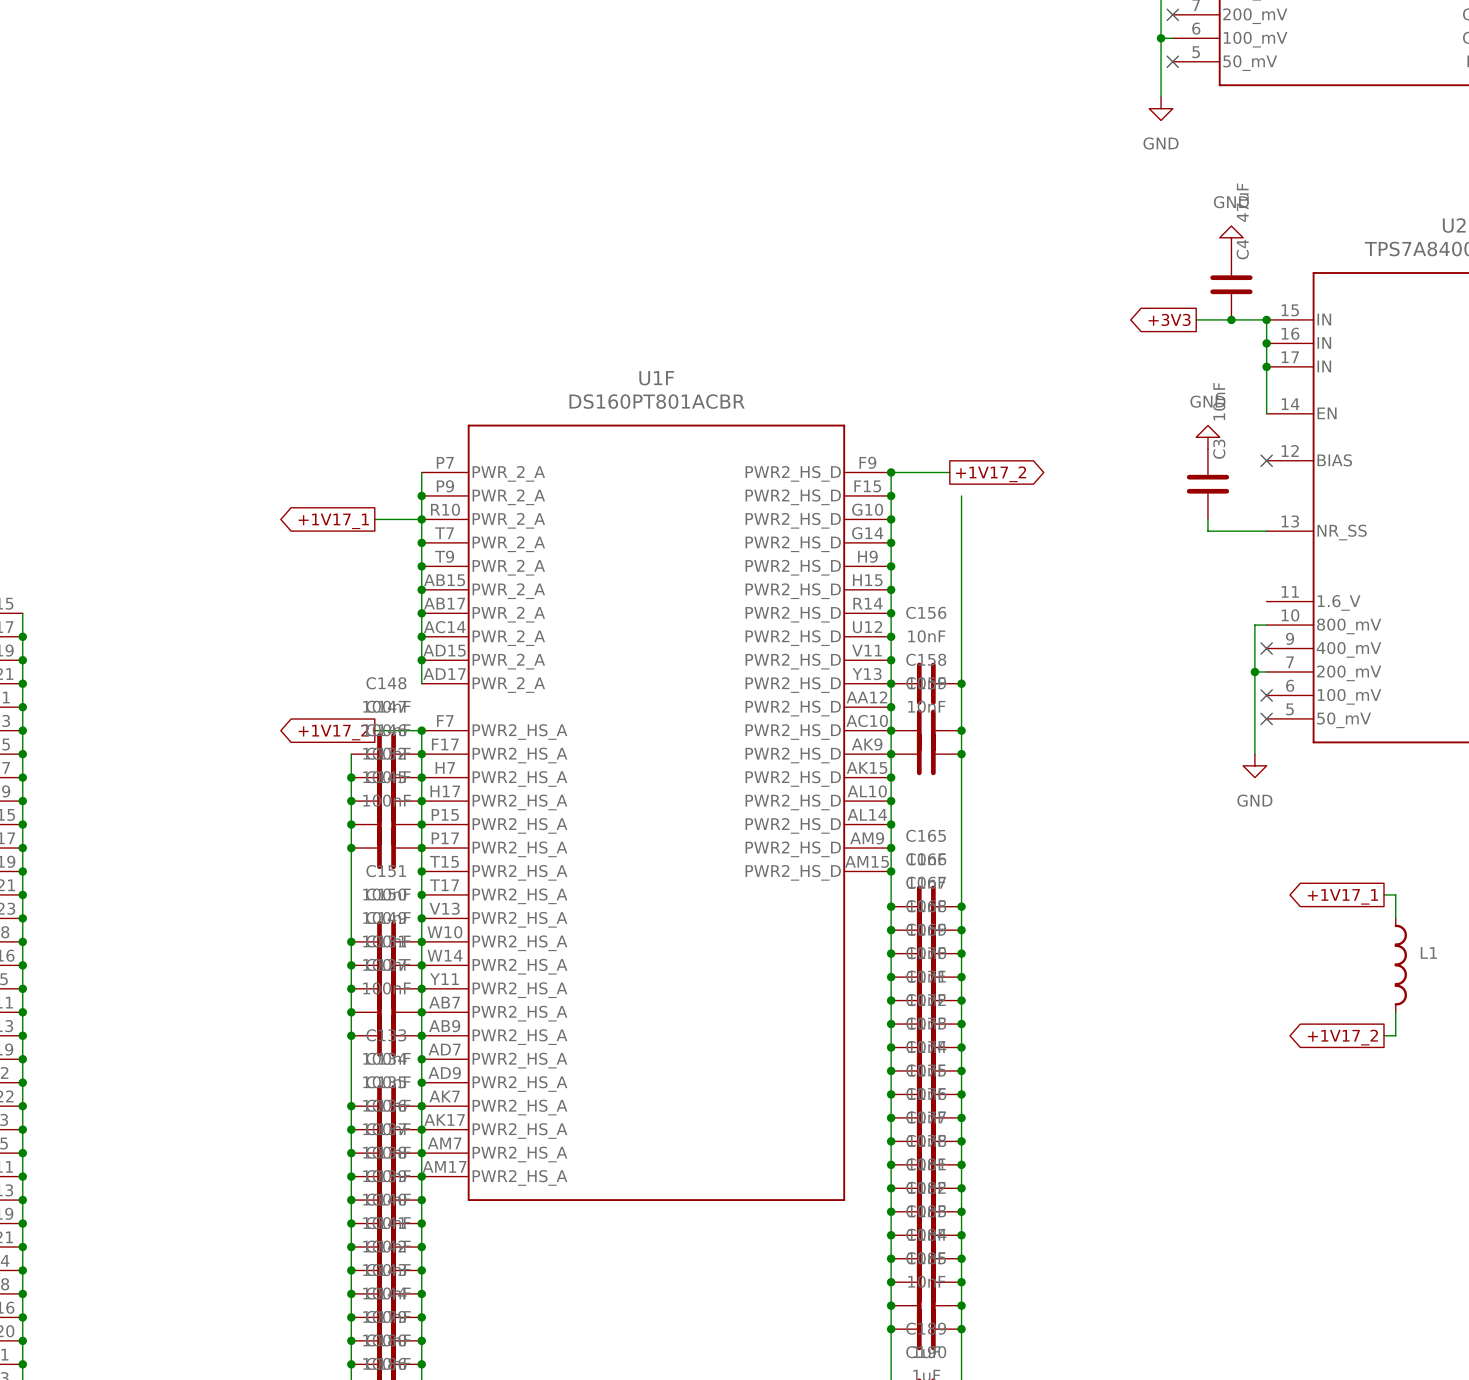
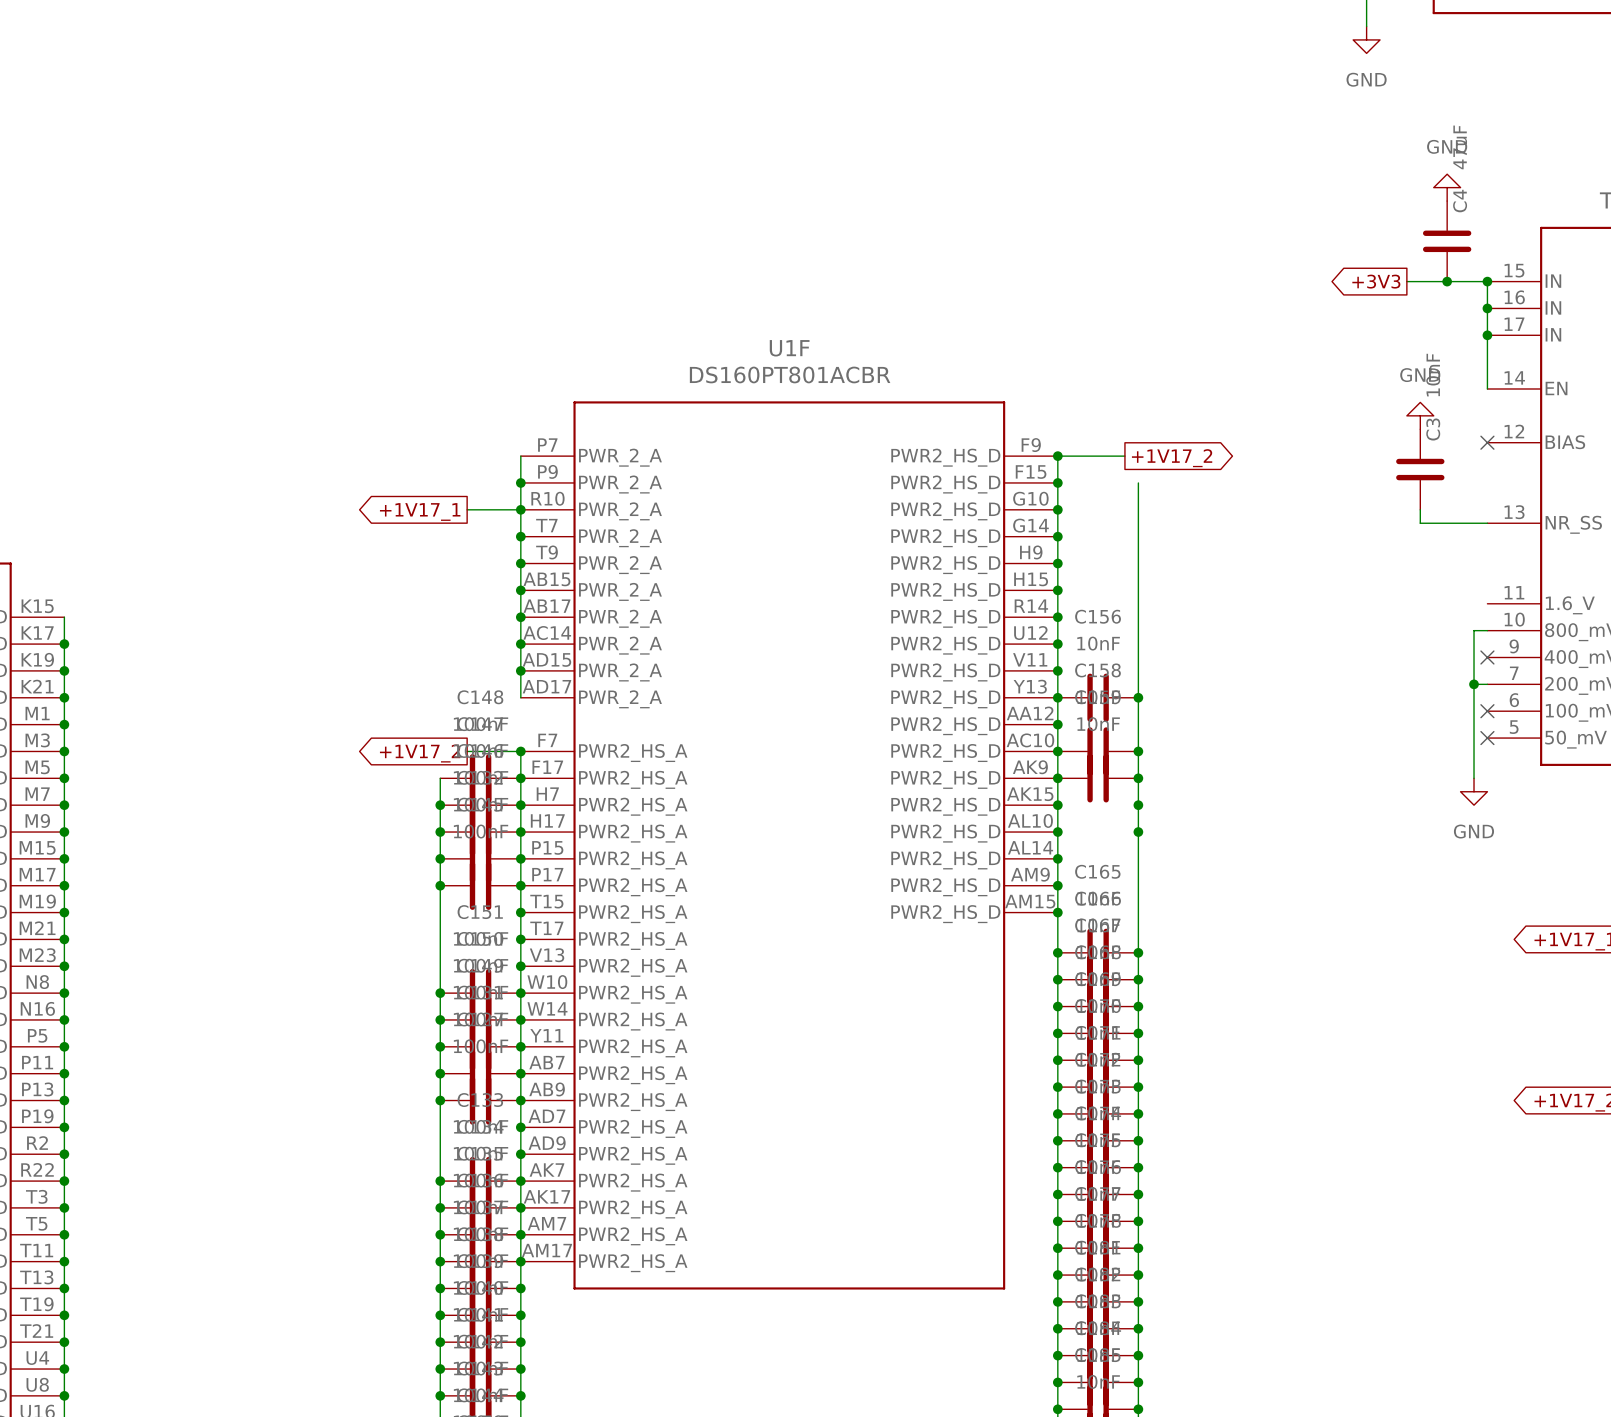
junction: none -> (1138, 805)
junction: none -> (1138, 832)

